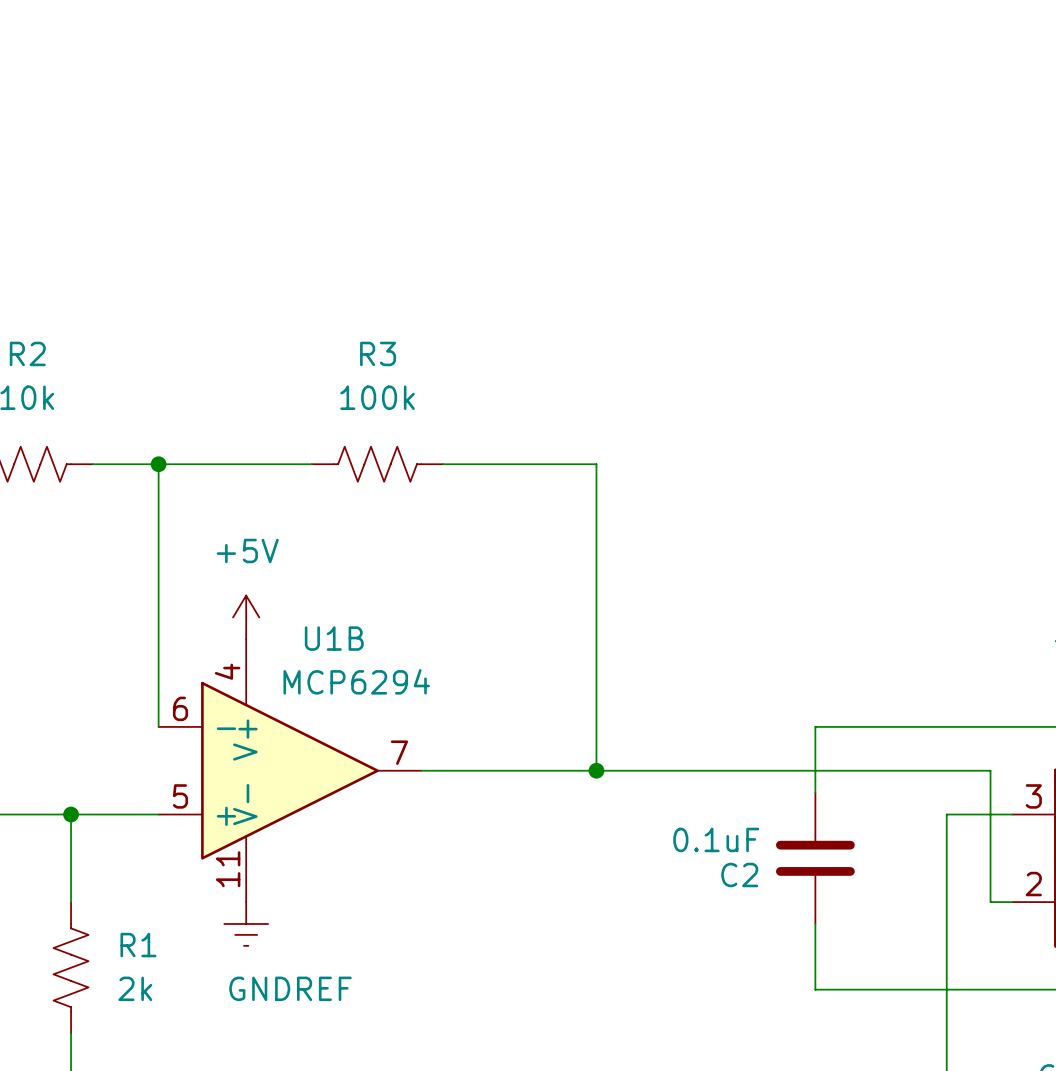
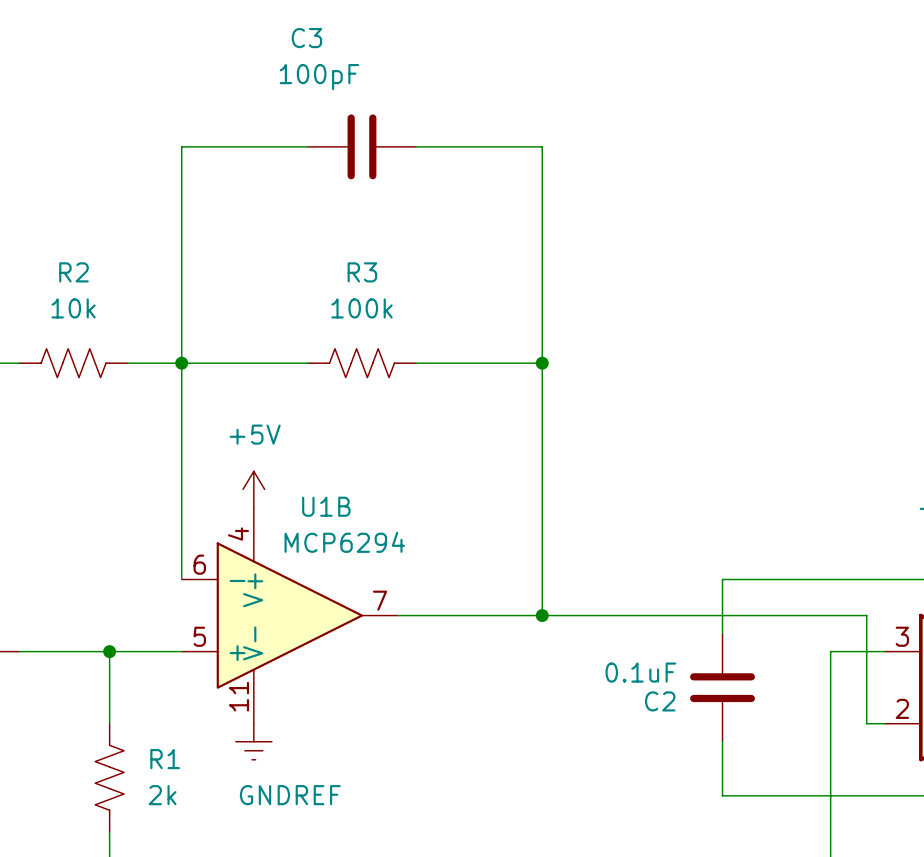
wire: none -> (307, 146) (181, 146) (181, 363)
C3: none -> 100pF (361, 146)
wire: none -> (416, 146) (542, 146) (542, 363)
junction: none -> (542, 363)

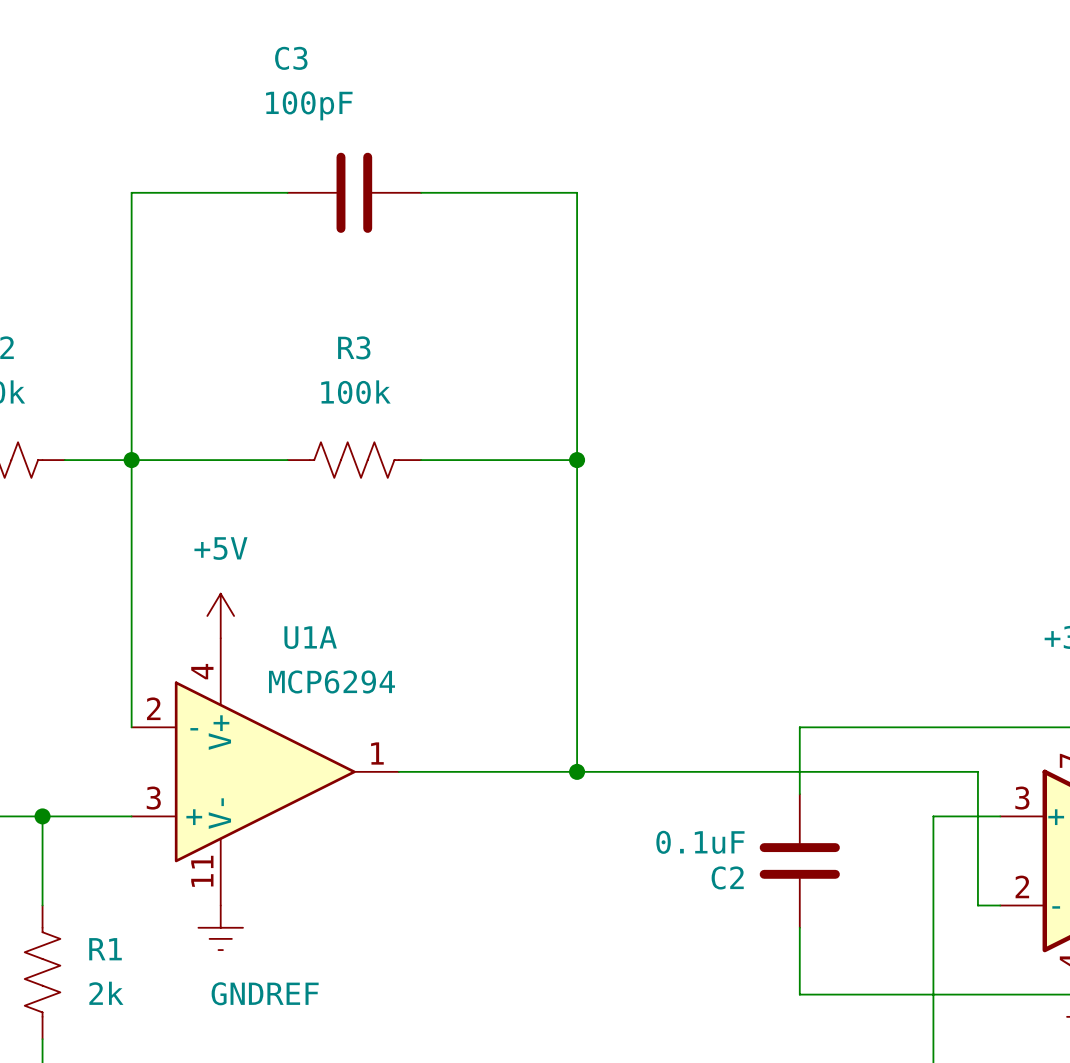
U1B name: U1B (326, 506) -> U1A (310, 637)
U1B pin number: 6 (199, 564) -> 2 (153, 708)
U1B pin number: 7 (380, 600) -> 1 (377, 753)
U1B pin number: 5 (199, 636) -> 3 (153, 798)

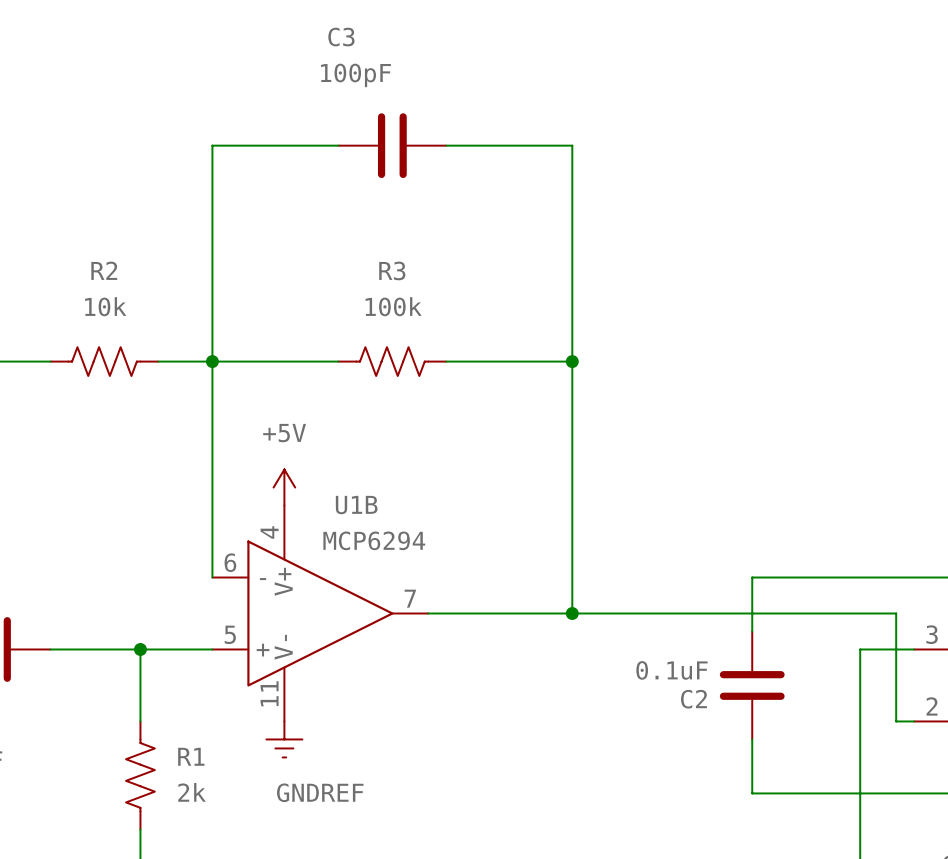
U1A name: U1A (310, 637) -> U1B (356, 505)
U1A pin number: 2 (153, 708) -> 6 (230, 562)
U1A pin number: 1 (377, 753) -> 7 (410, 598)
U1A pin number: 3 (153, 798) -> 5 (230, 634)

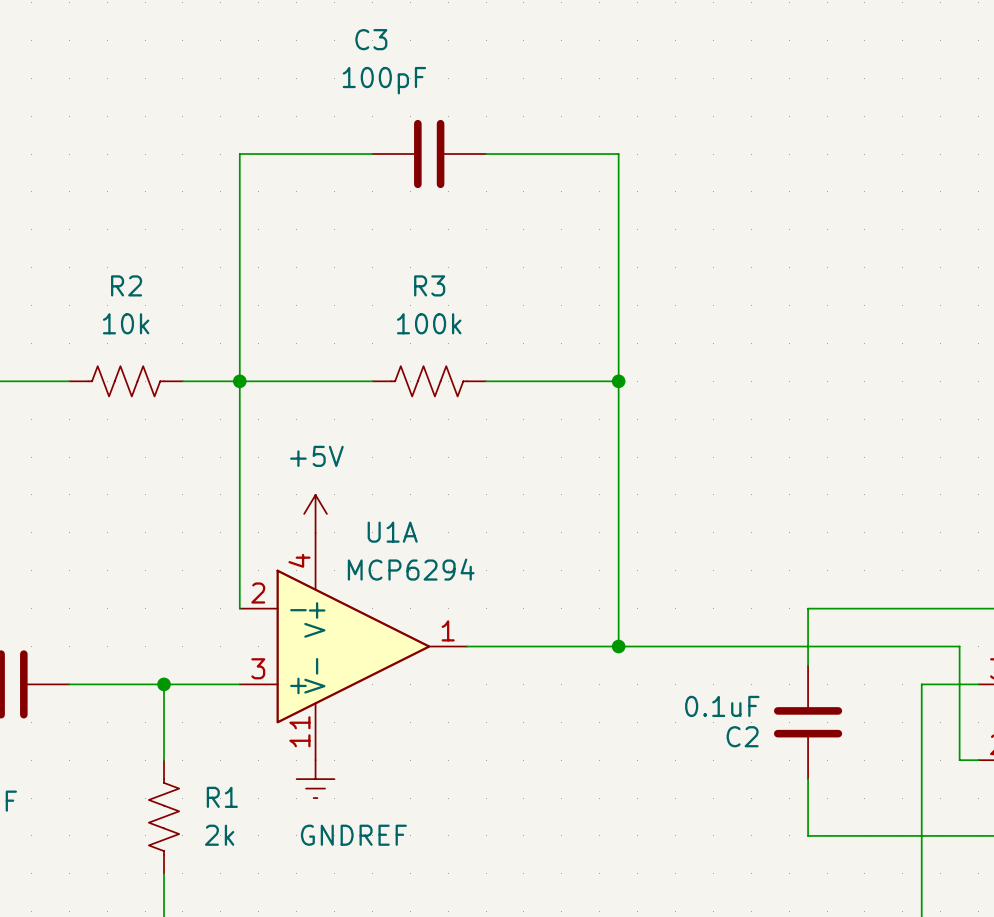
U1B name: U1B (356, 505) -> U1A (392, 532)
U1B pin number: 6 (230, 562) -> 2 (258, 593)
U1B pin number: 7 (410, 598) -> 1 (448, 630)
U1B pin number: 5 (230, 634) -> 3 (258, 668)

